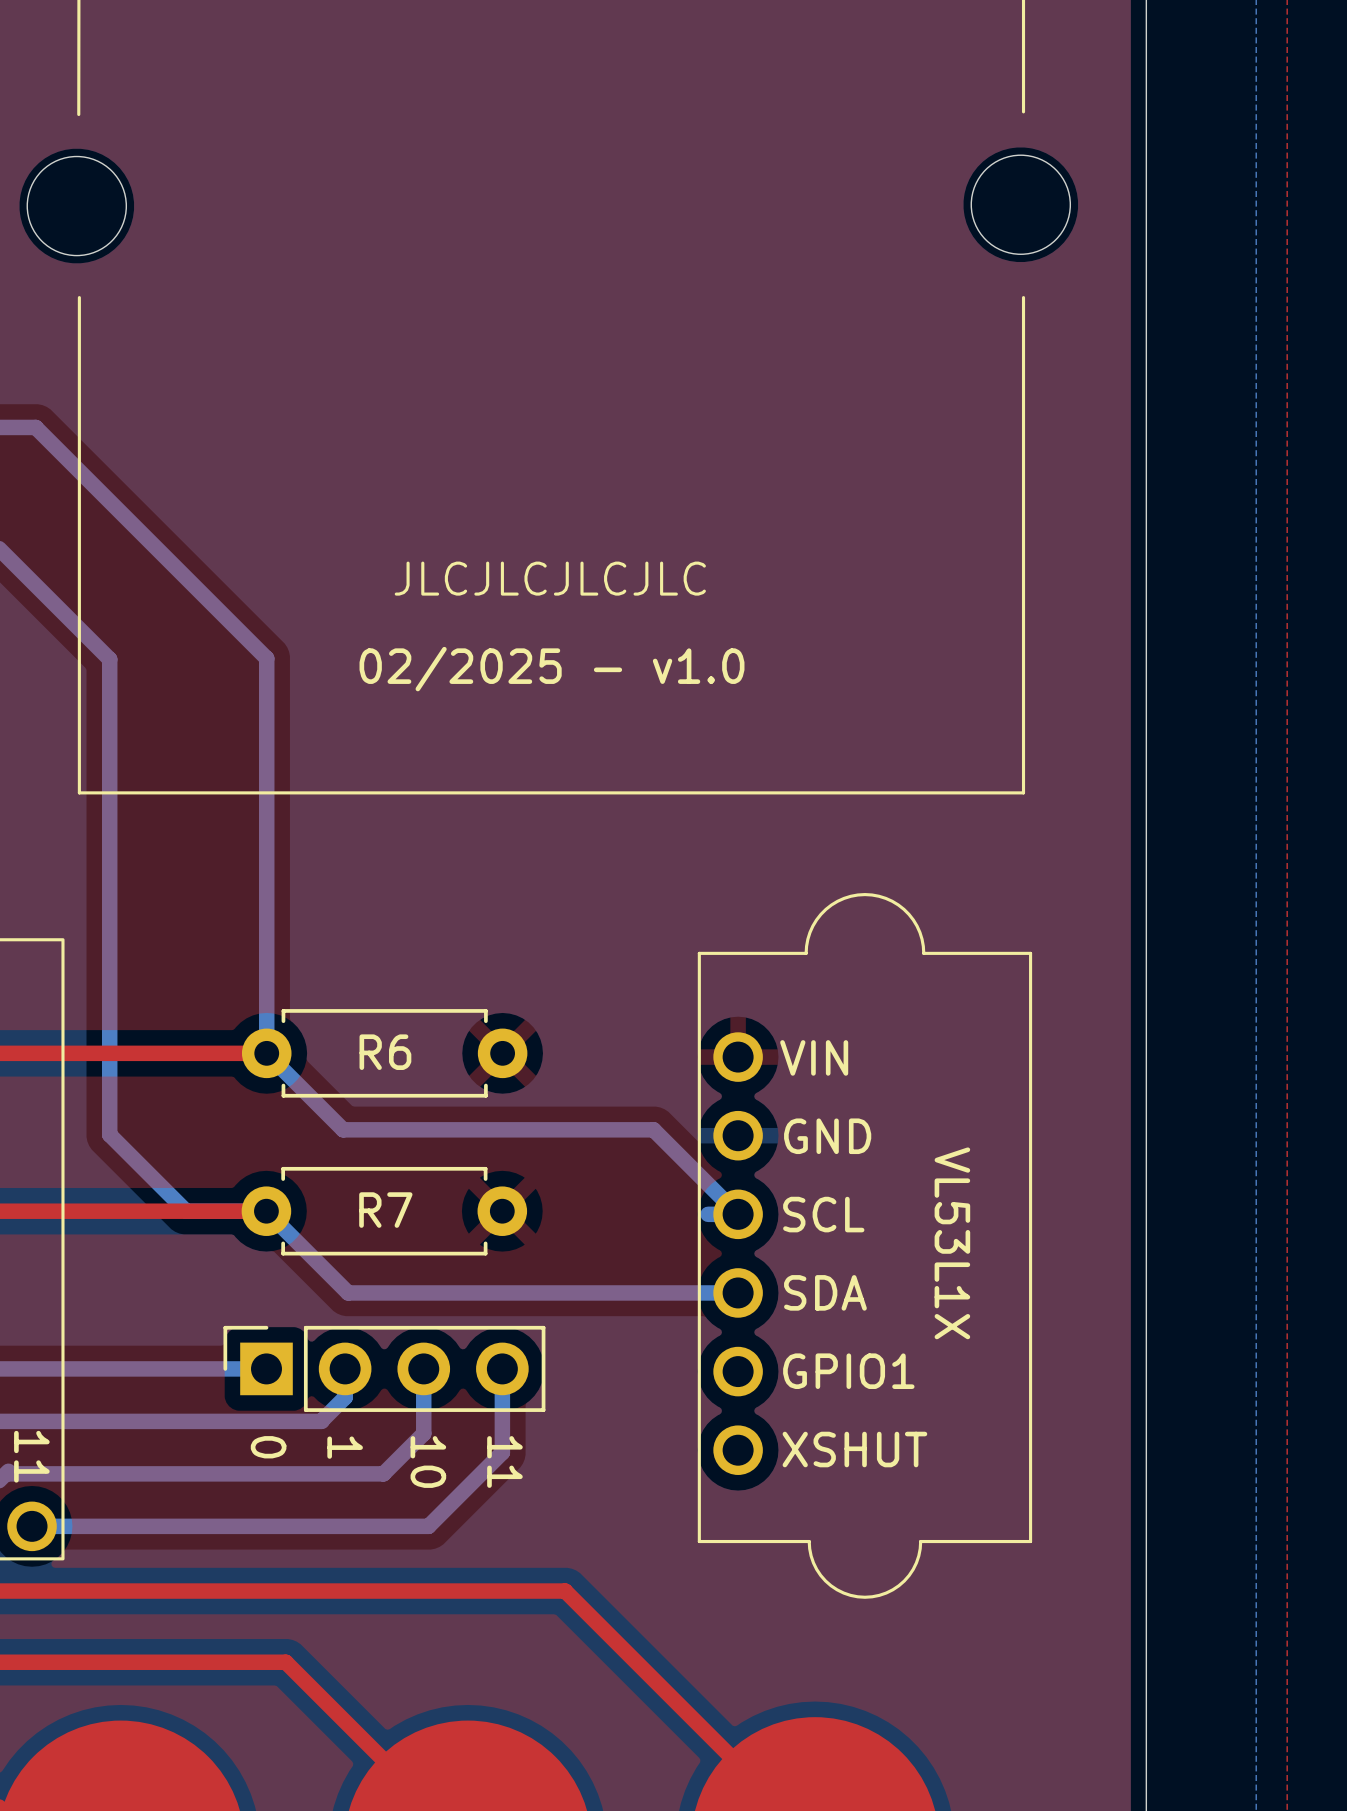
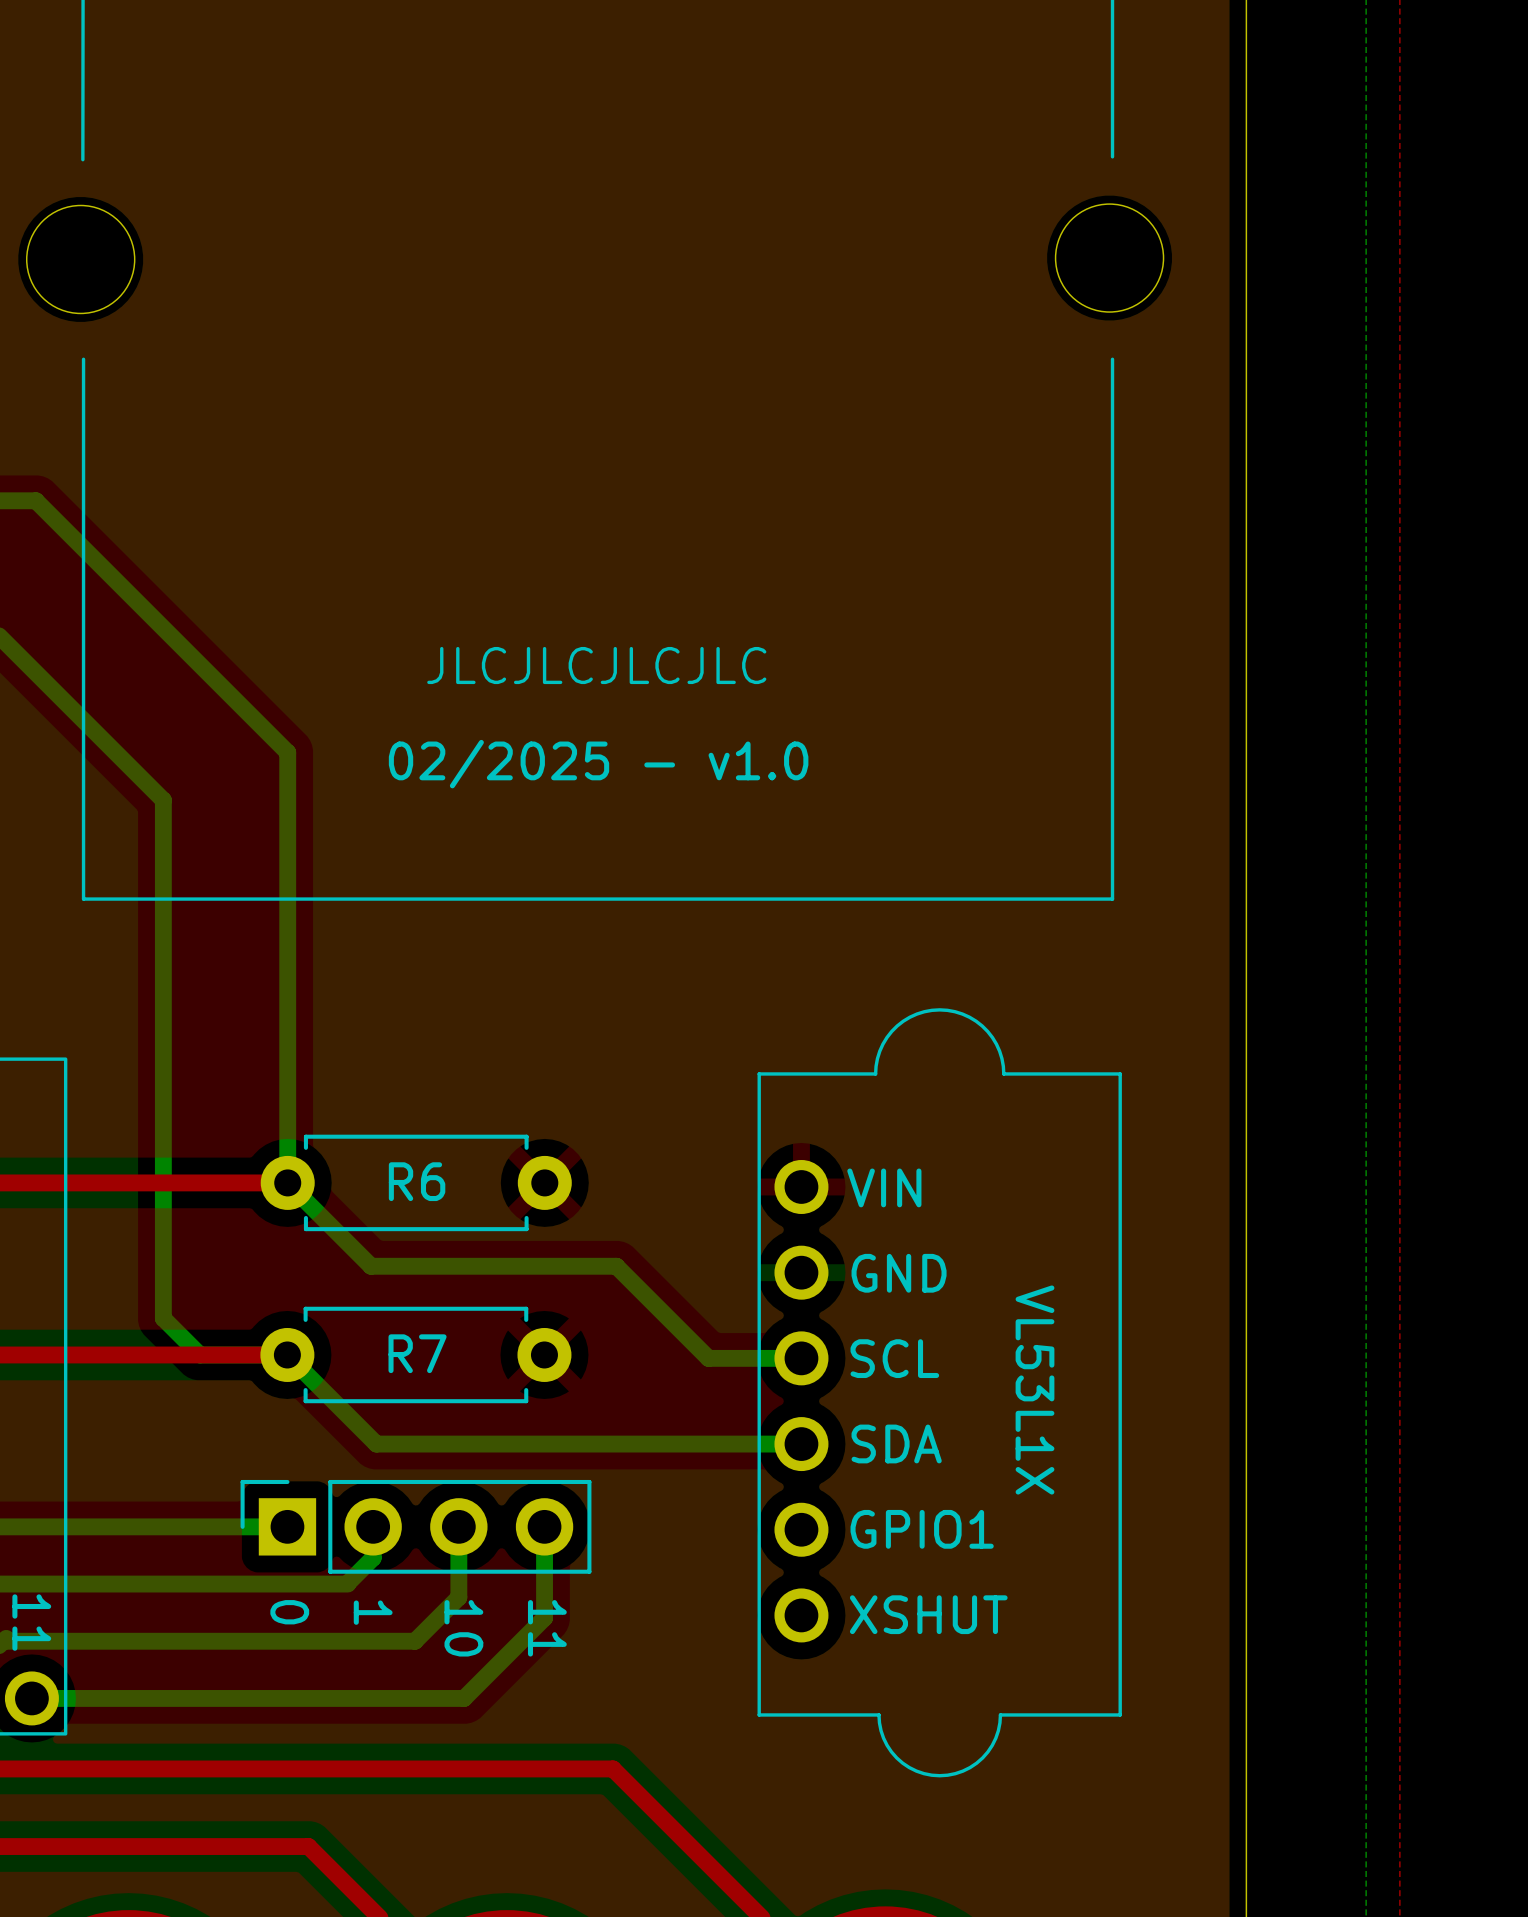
bottom track: (109, 659) (109, 1134) (152, 1177) -> (116, 753) (163, 800) (163, 1318)
bottom track: (568, 1129) (653, 1129) (738, 1214) -> (616, 1266) (708, 1358) (768, 1358)

